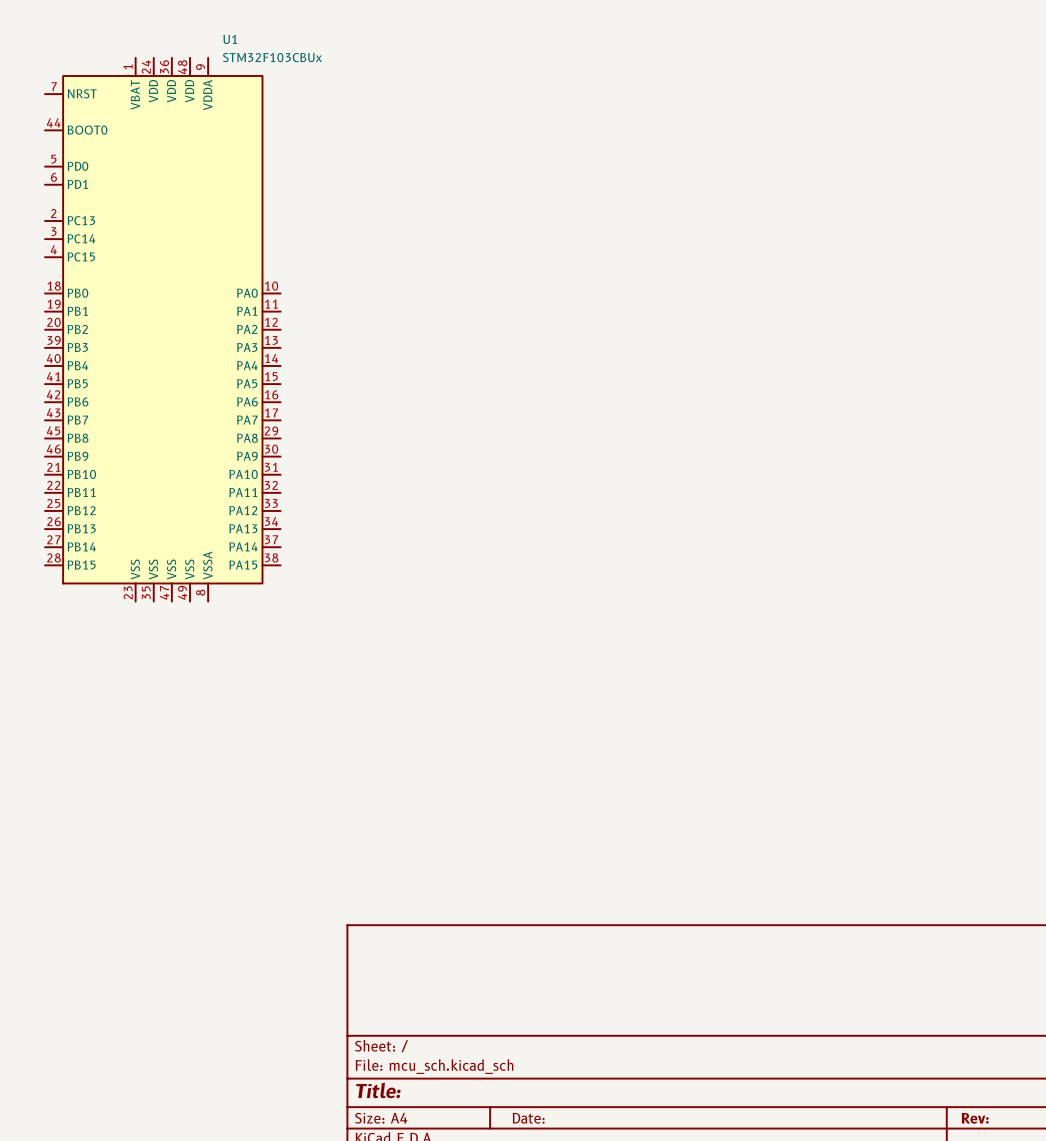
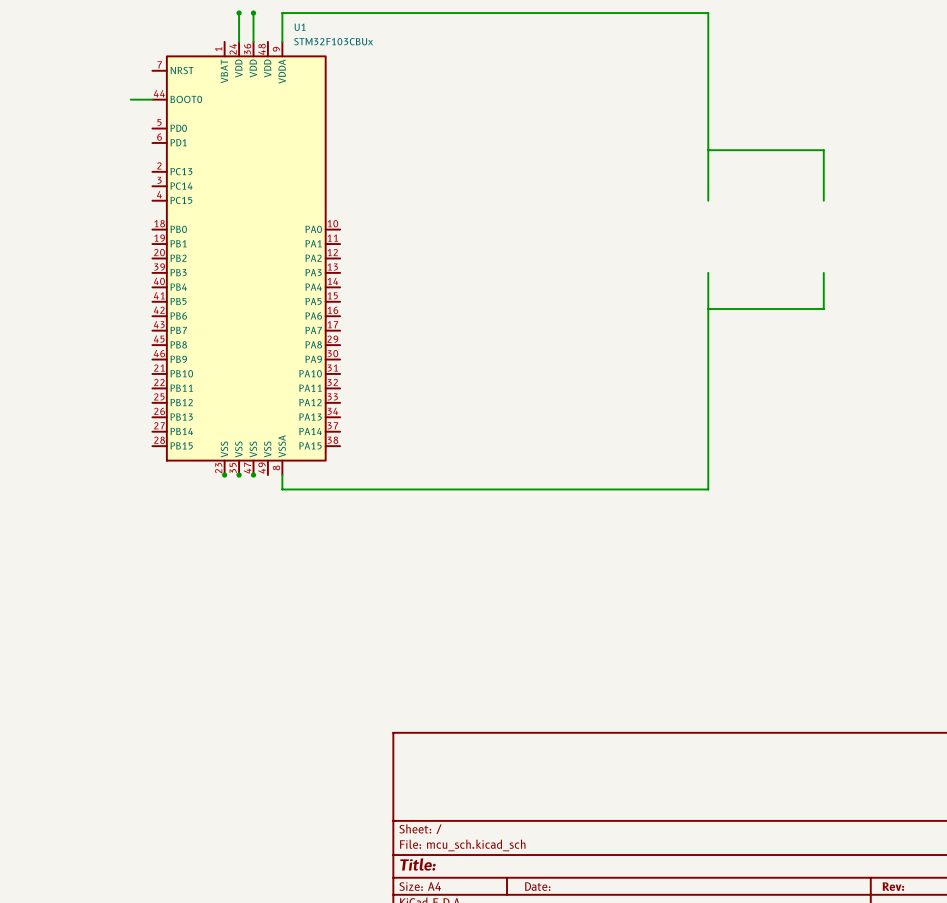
wire: none -> (239, 13) (239, 41)
junction: none -> (239, 13)
wire: none -> (253, 13) (253, 41)
junction: none -> (253, 13)
wire: none -> (282, 41) (282, 13) (708, 13) (708, 200)
wire: none -> (130, 99) (152, 99)
wire: none -> (708, 150) (823, 150) (823, 200)
wire: none -> (708, 272) (708, 489) (282, 489) (282, 475)
wire: none -> (823, 272) (823, 309) (708, 309)
junction: none -> (224, 475)
junction: none -> (239, 475)
junction: none -> (253, 475)

